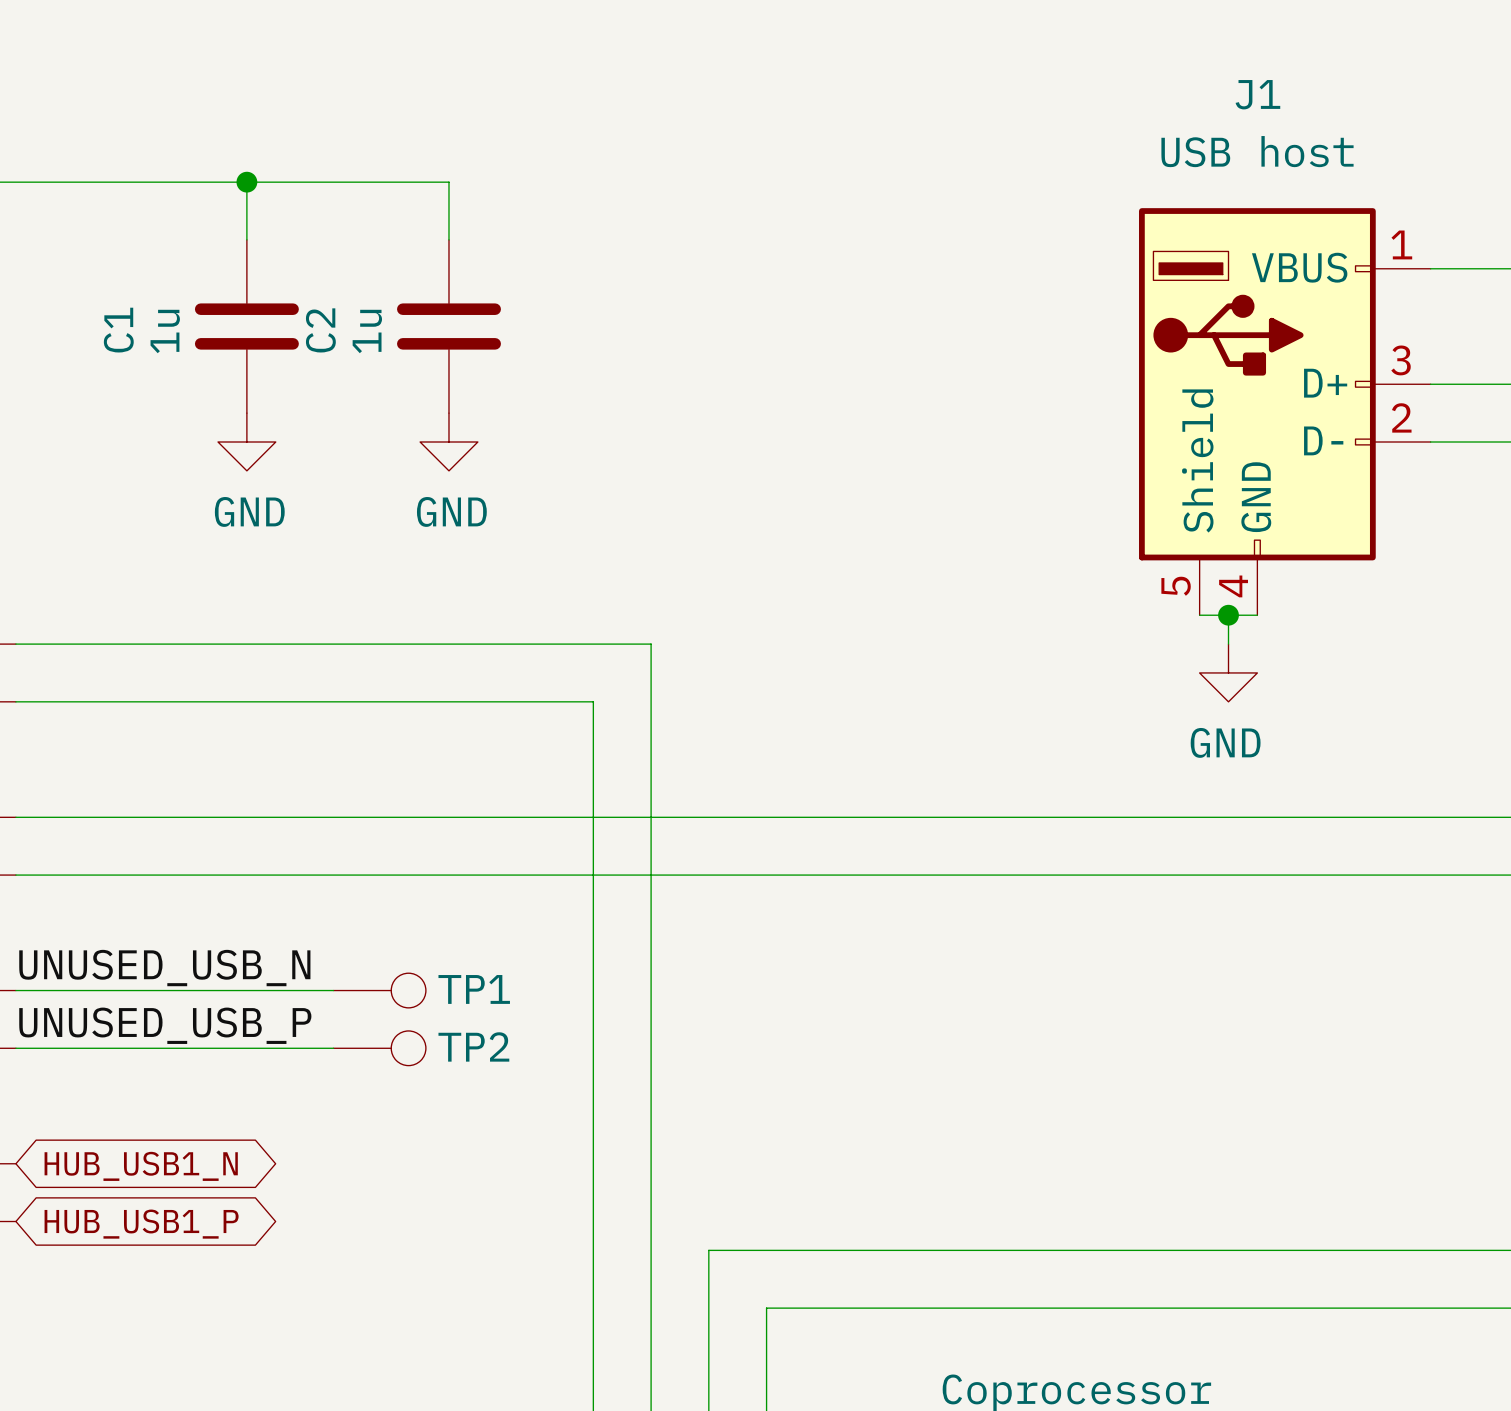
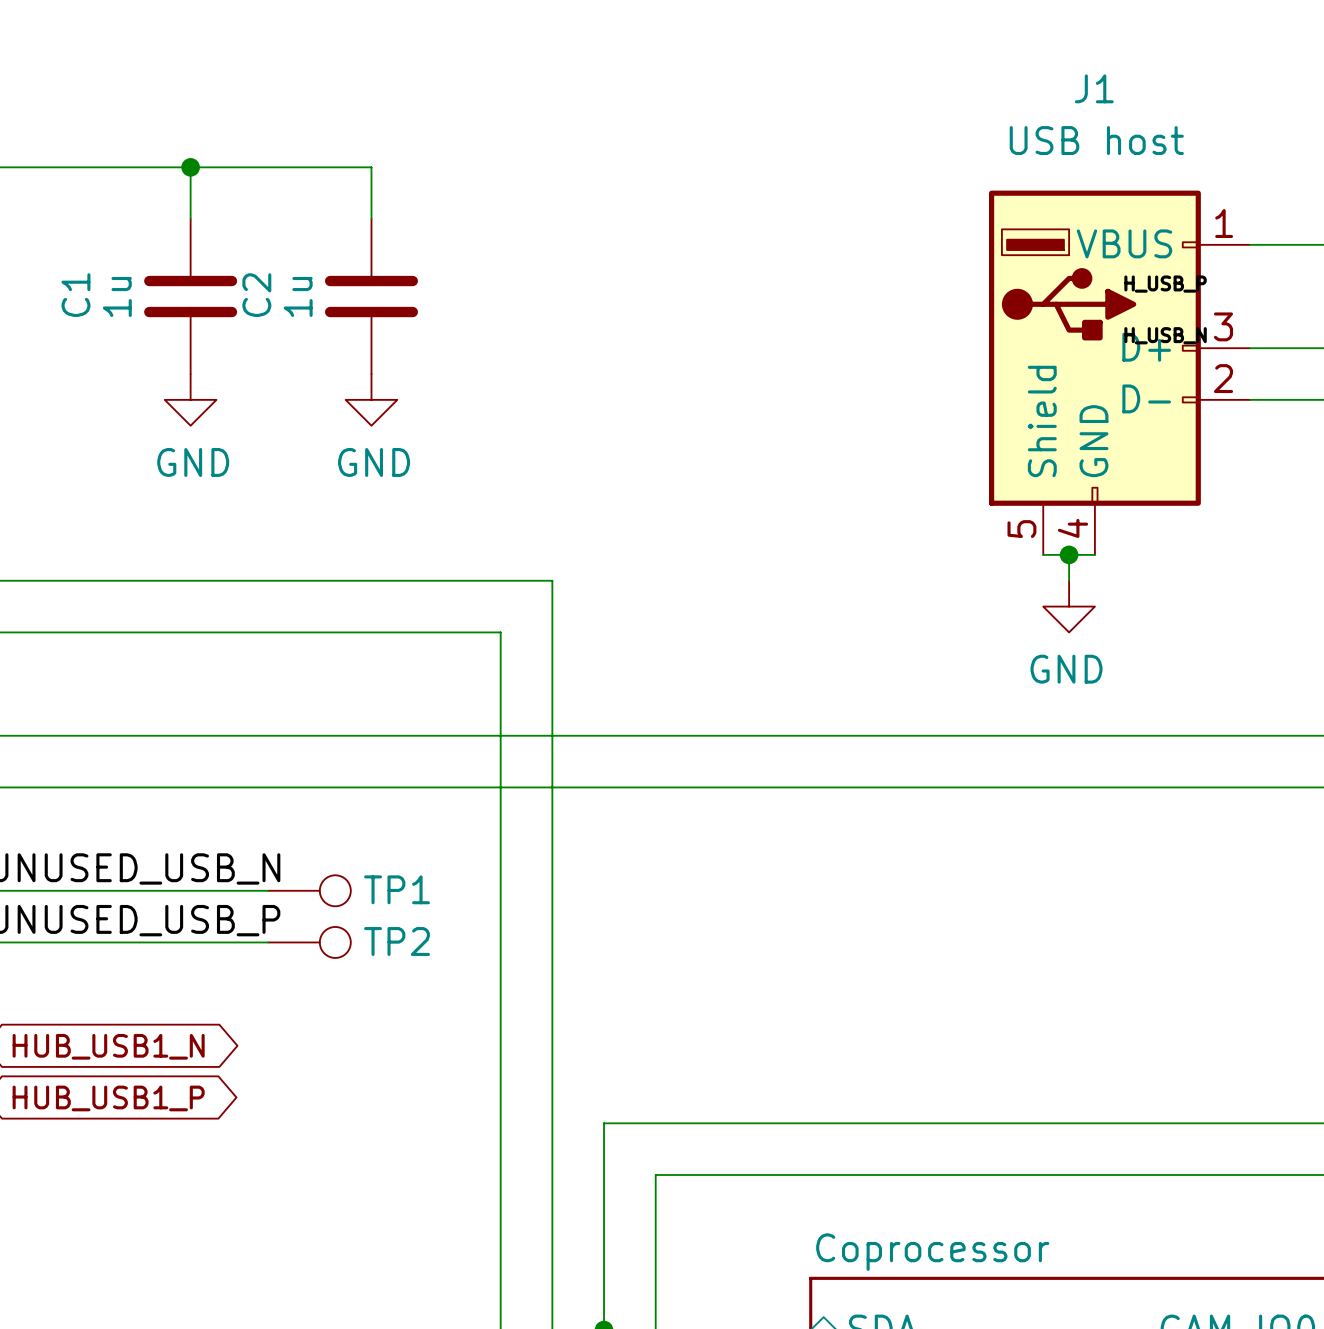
label: none -> H_USB_P (1165, 284)
label: none -> H_USB_N (1165, 335)

